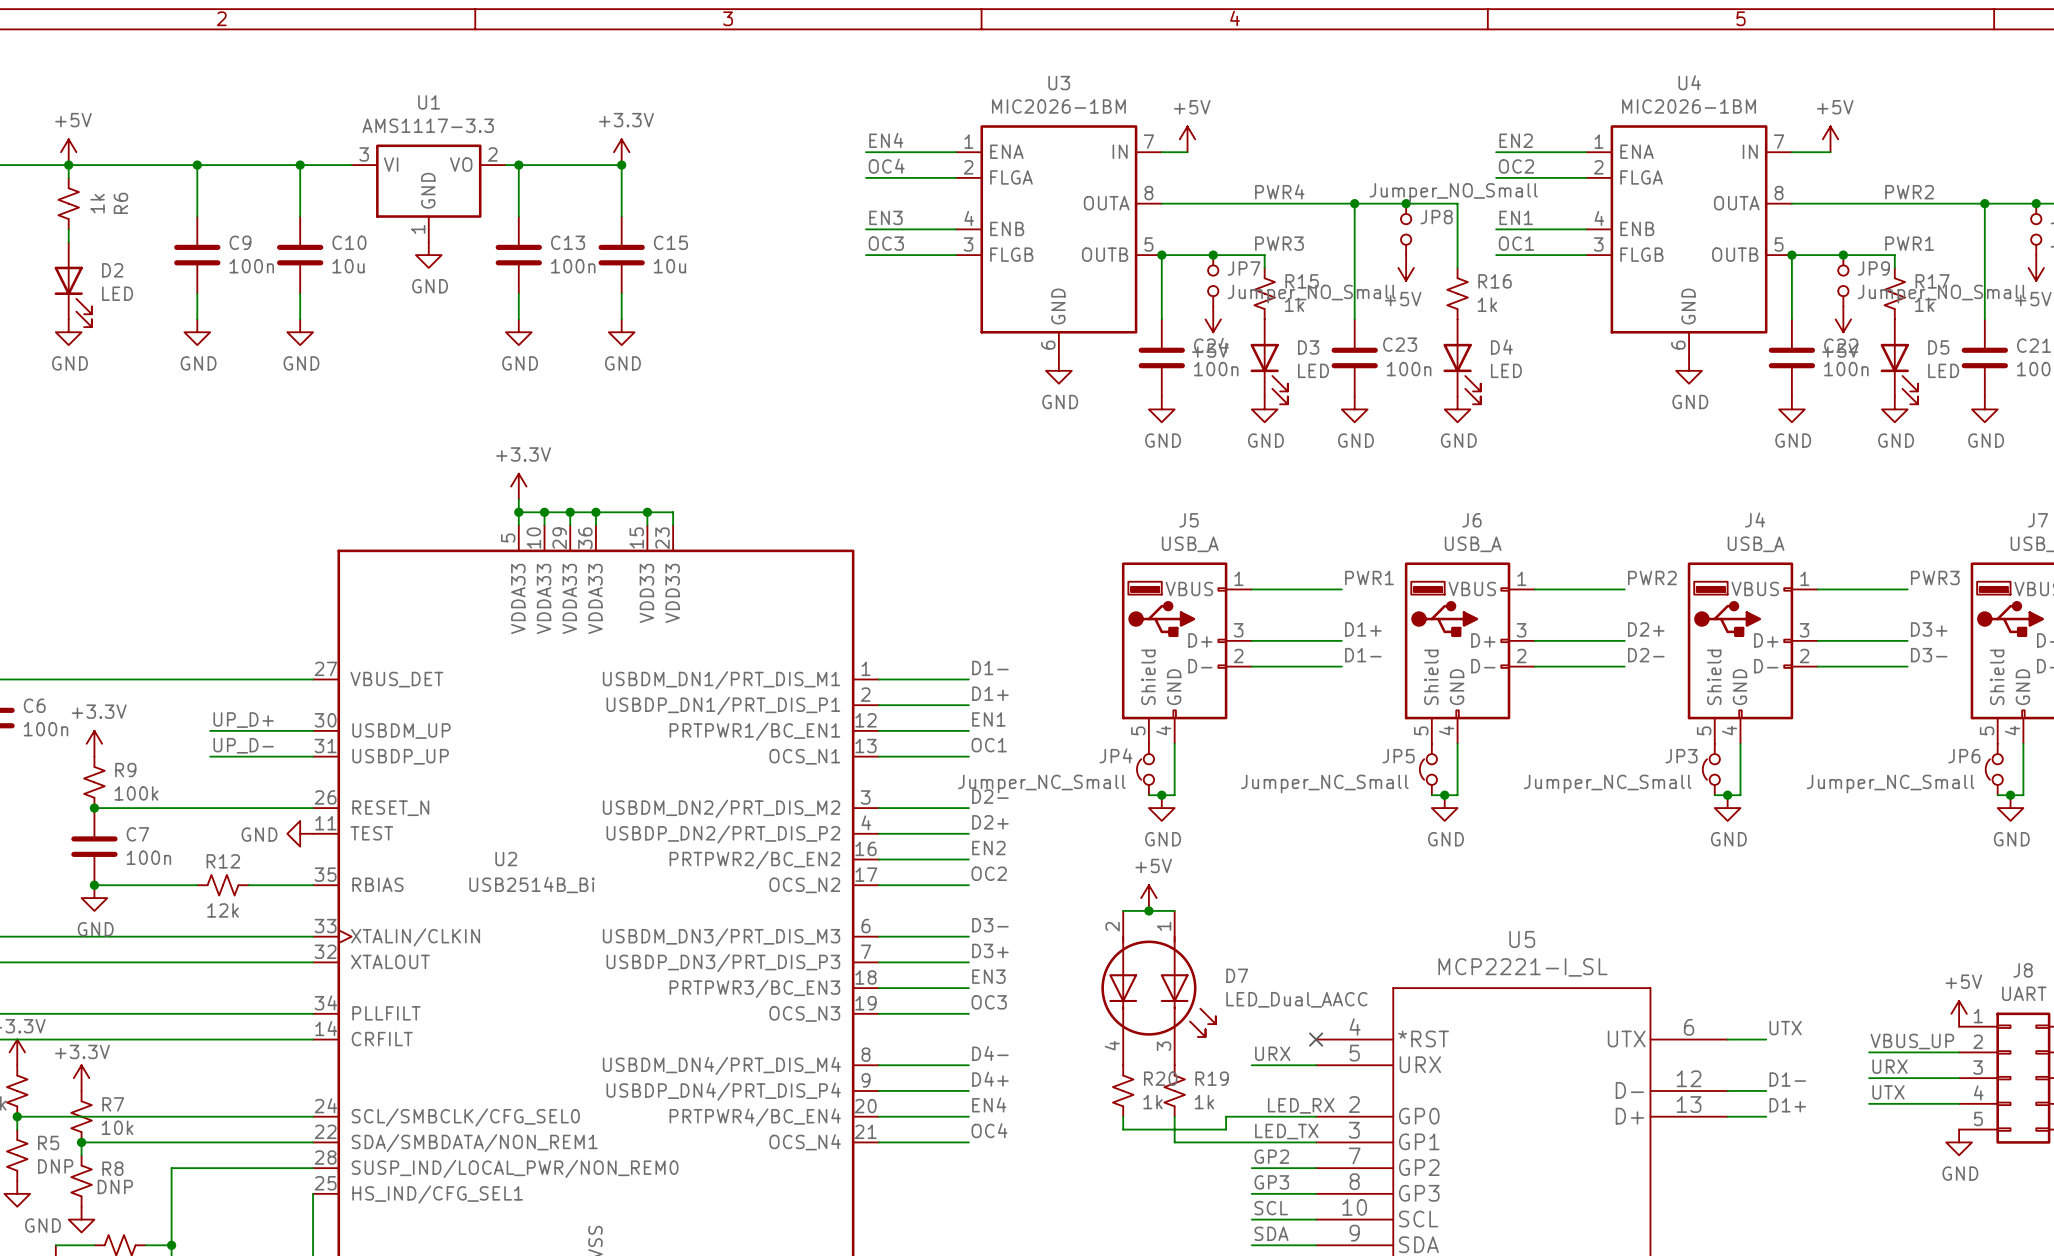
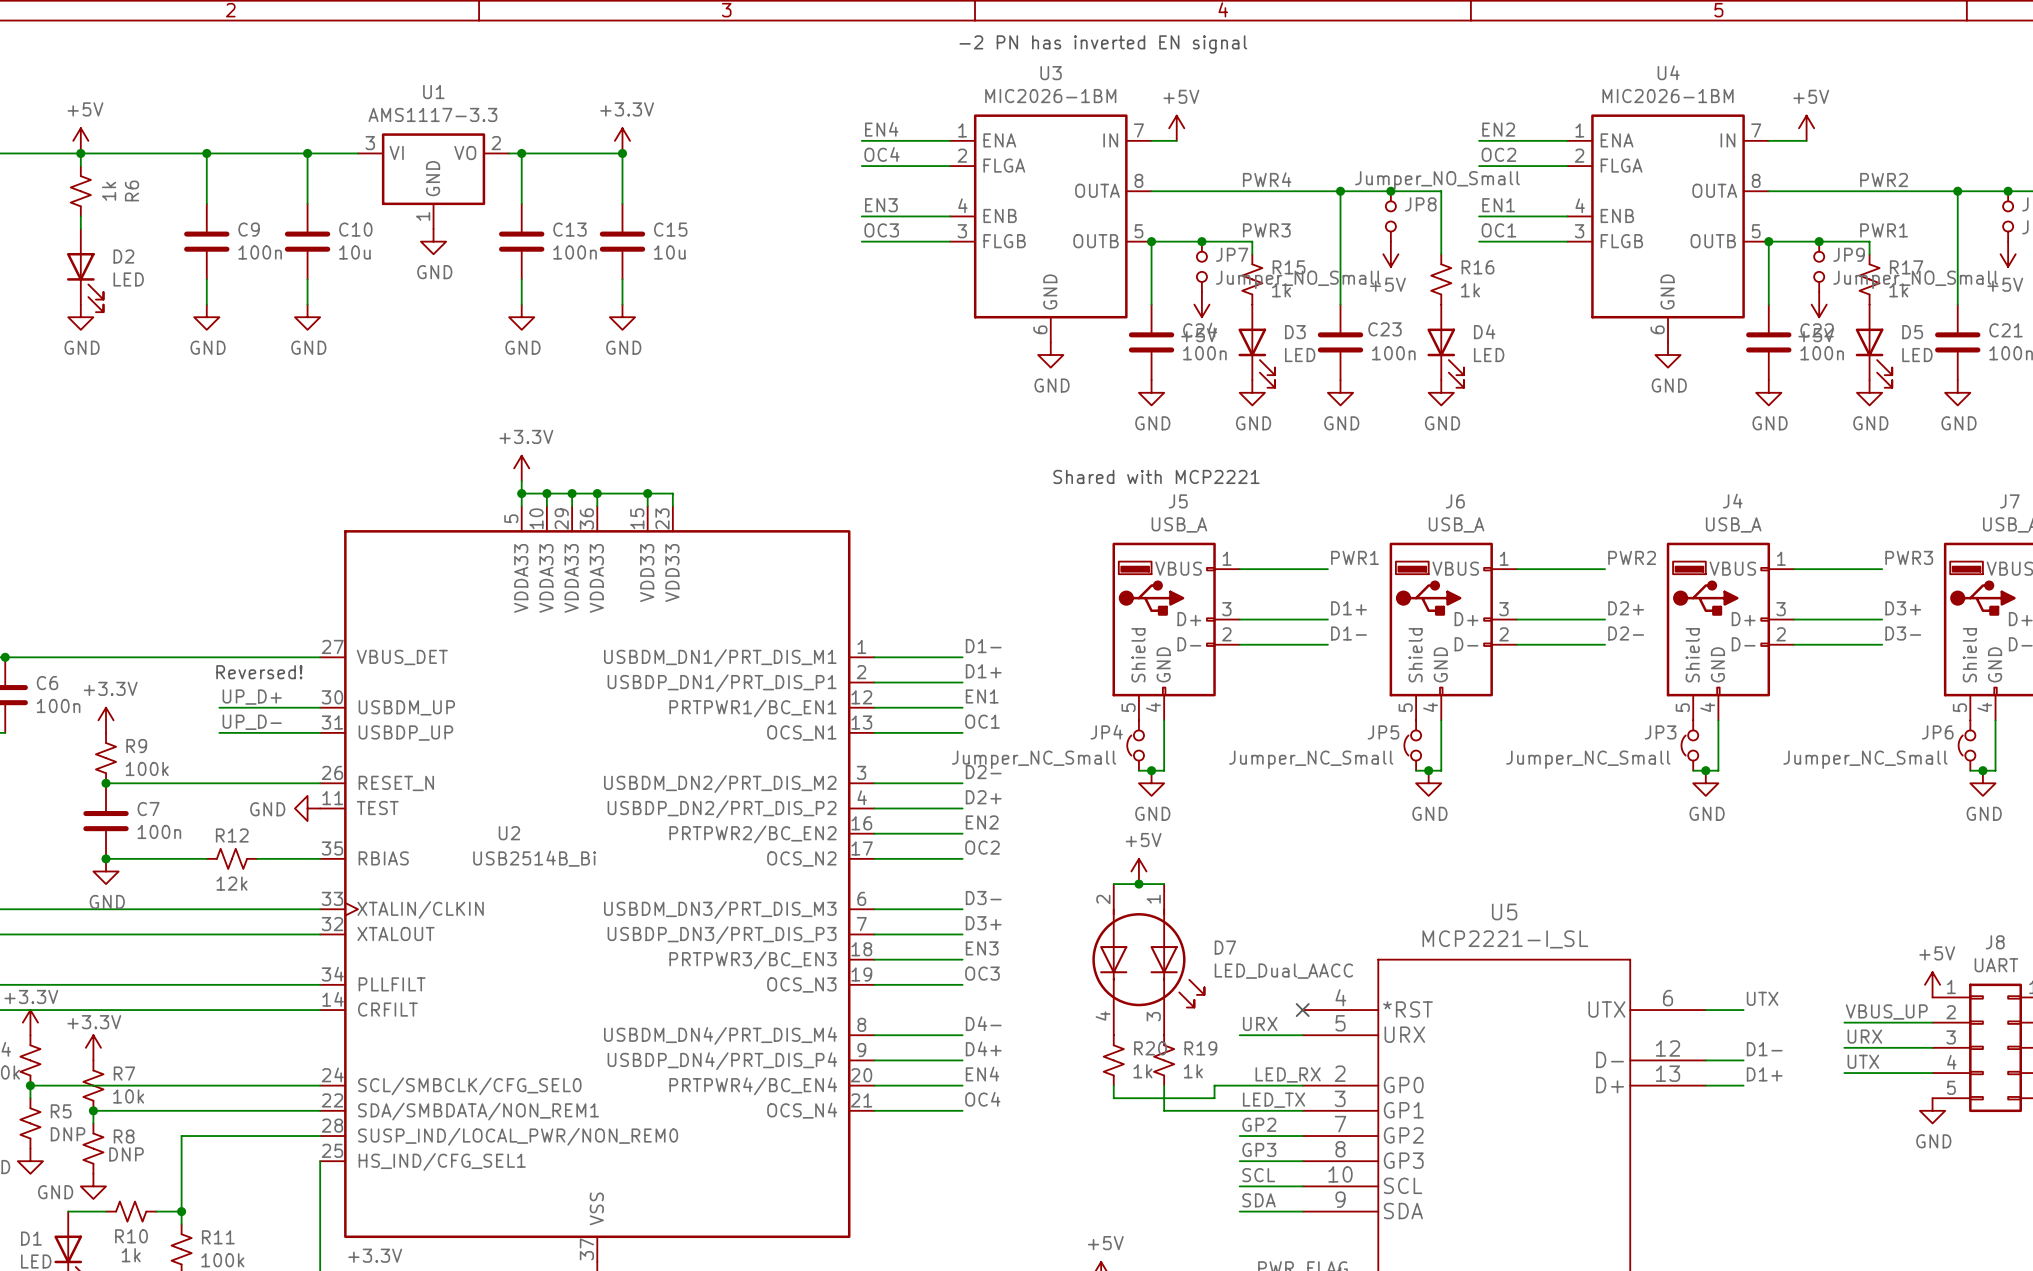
text: none -> -2 PN has inverted EN signal (1103, 44)
text: none -> Shared with MCP2221 (1156, 476)
text: none -> Reversed! (259, 672)

